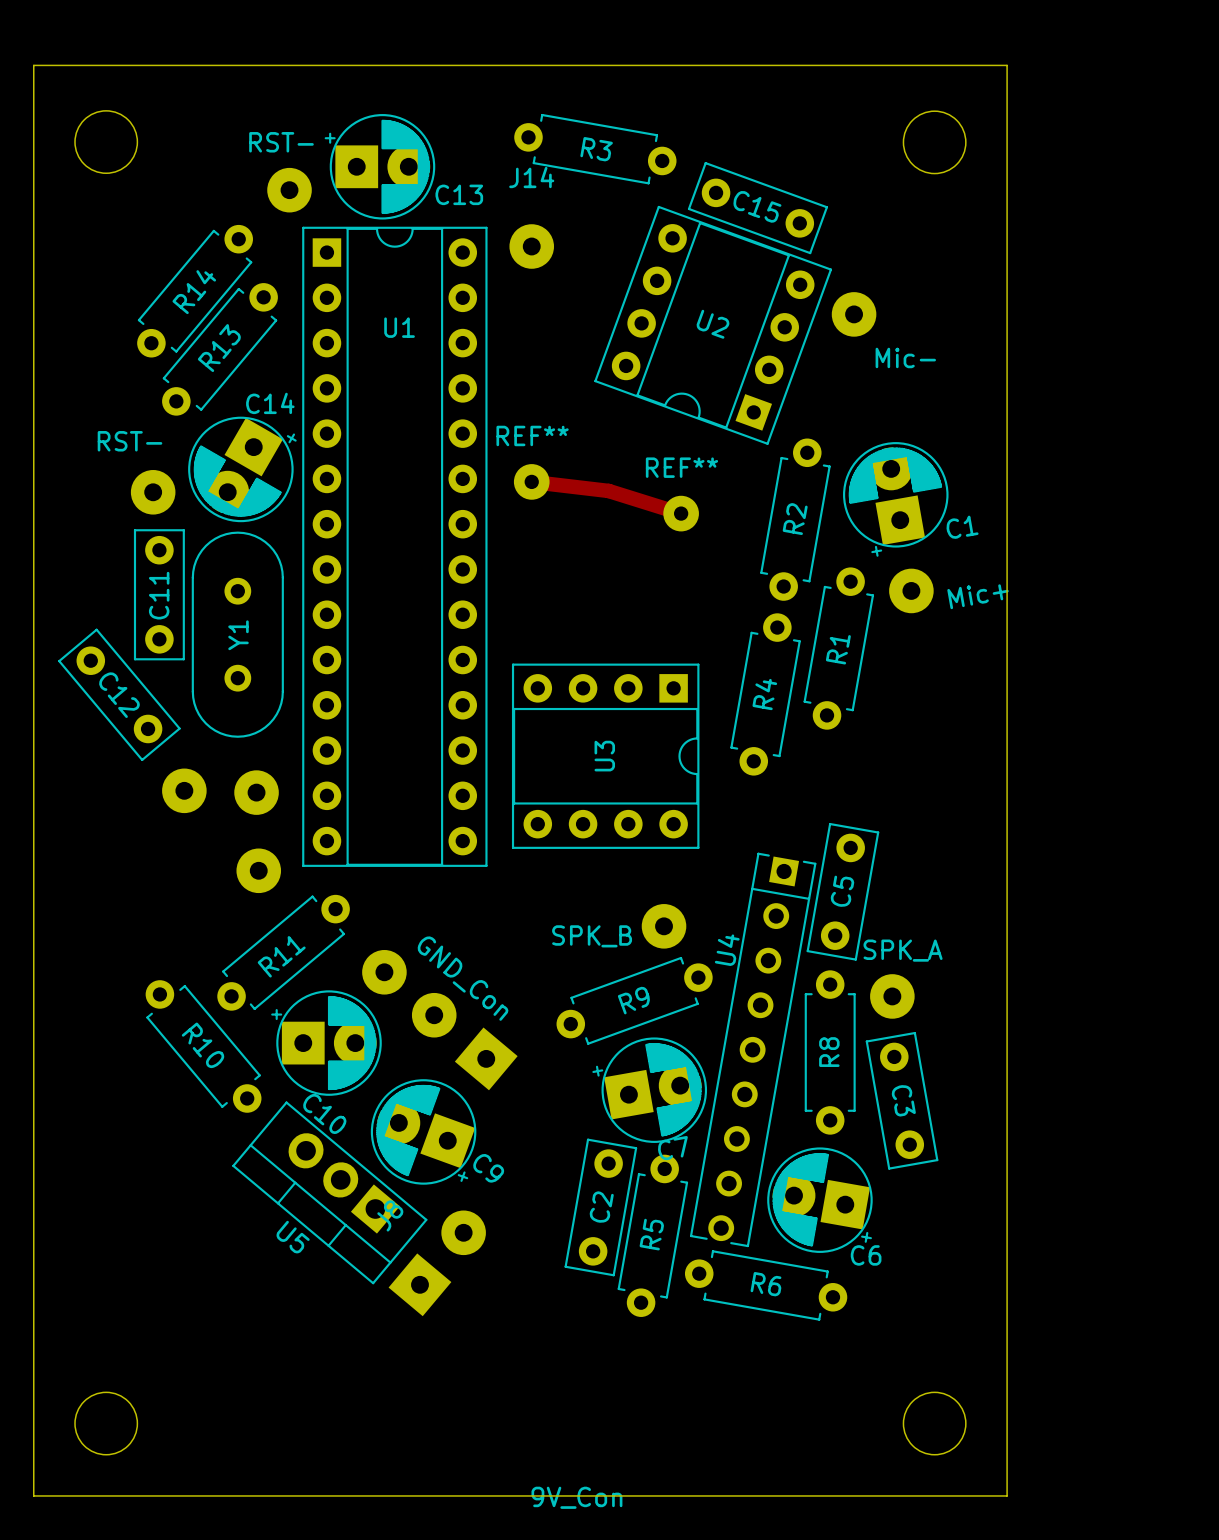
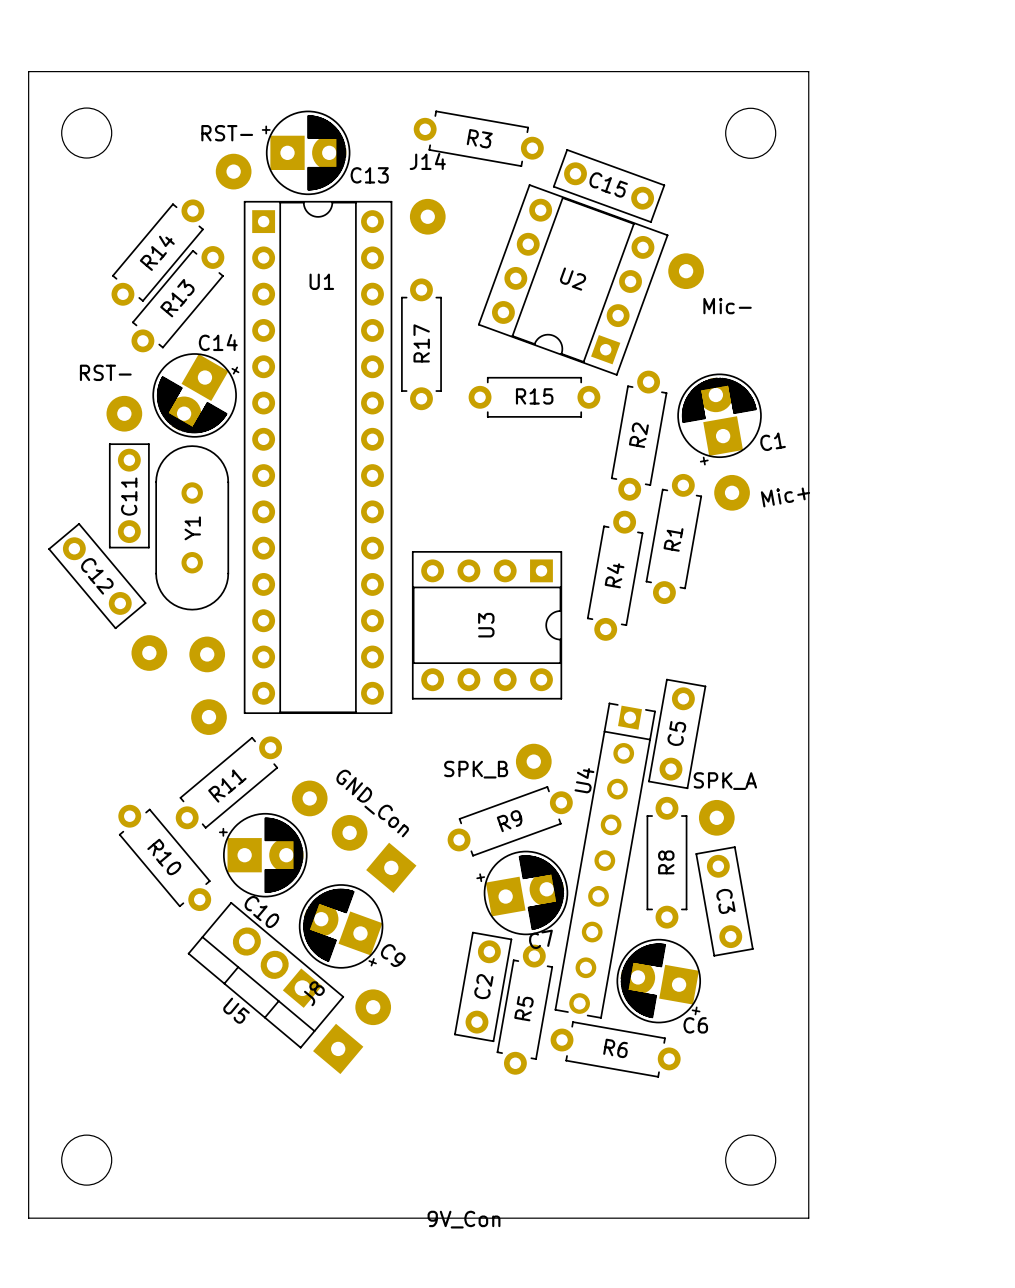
R17: none -> (421, 344)
R15: none -> (534, 397)
track: (531, 481) (608, 490) (681, 513) -> none
REF**: (531, 481) -> none
REF**: (681, 513) -> none

